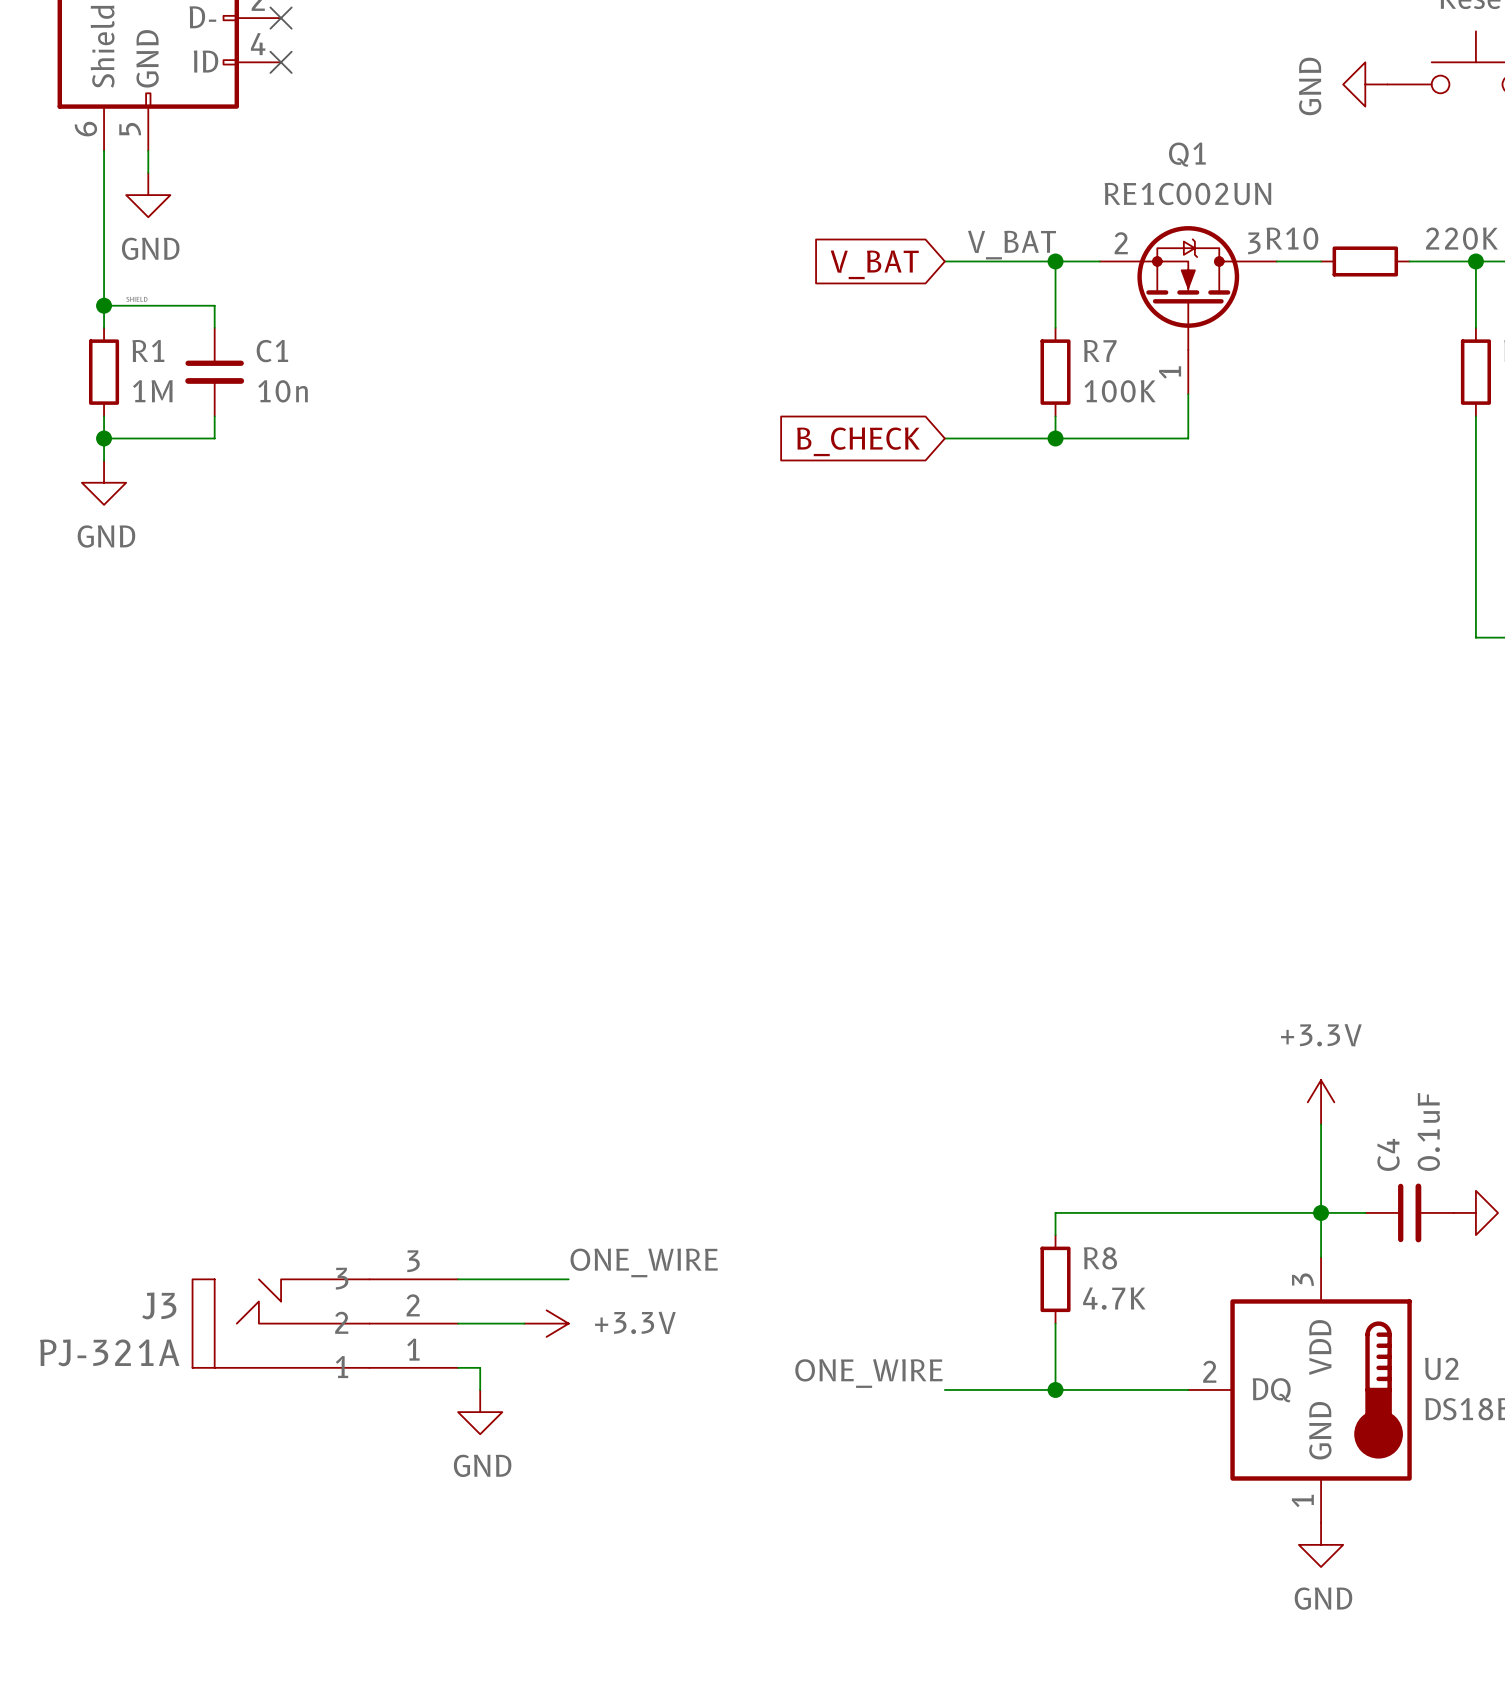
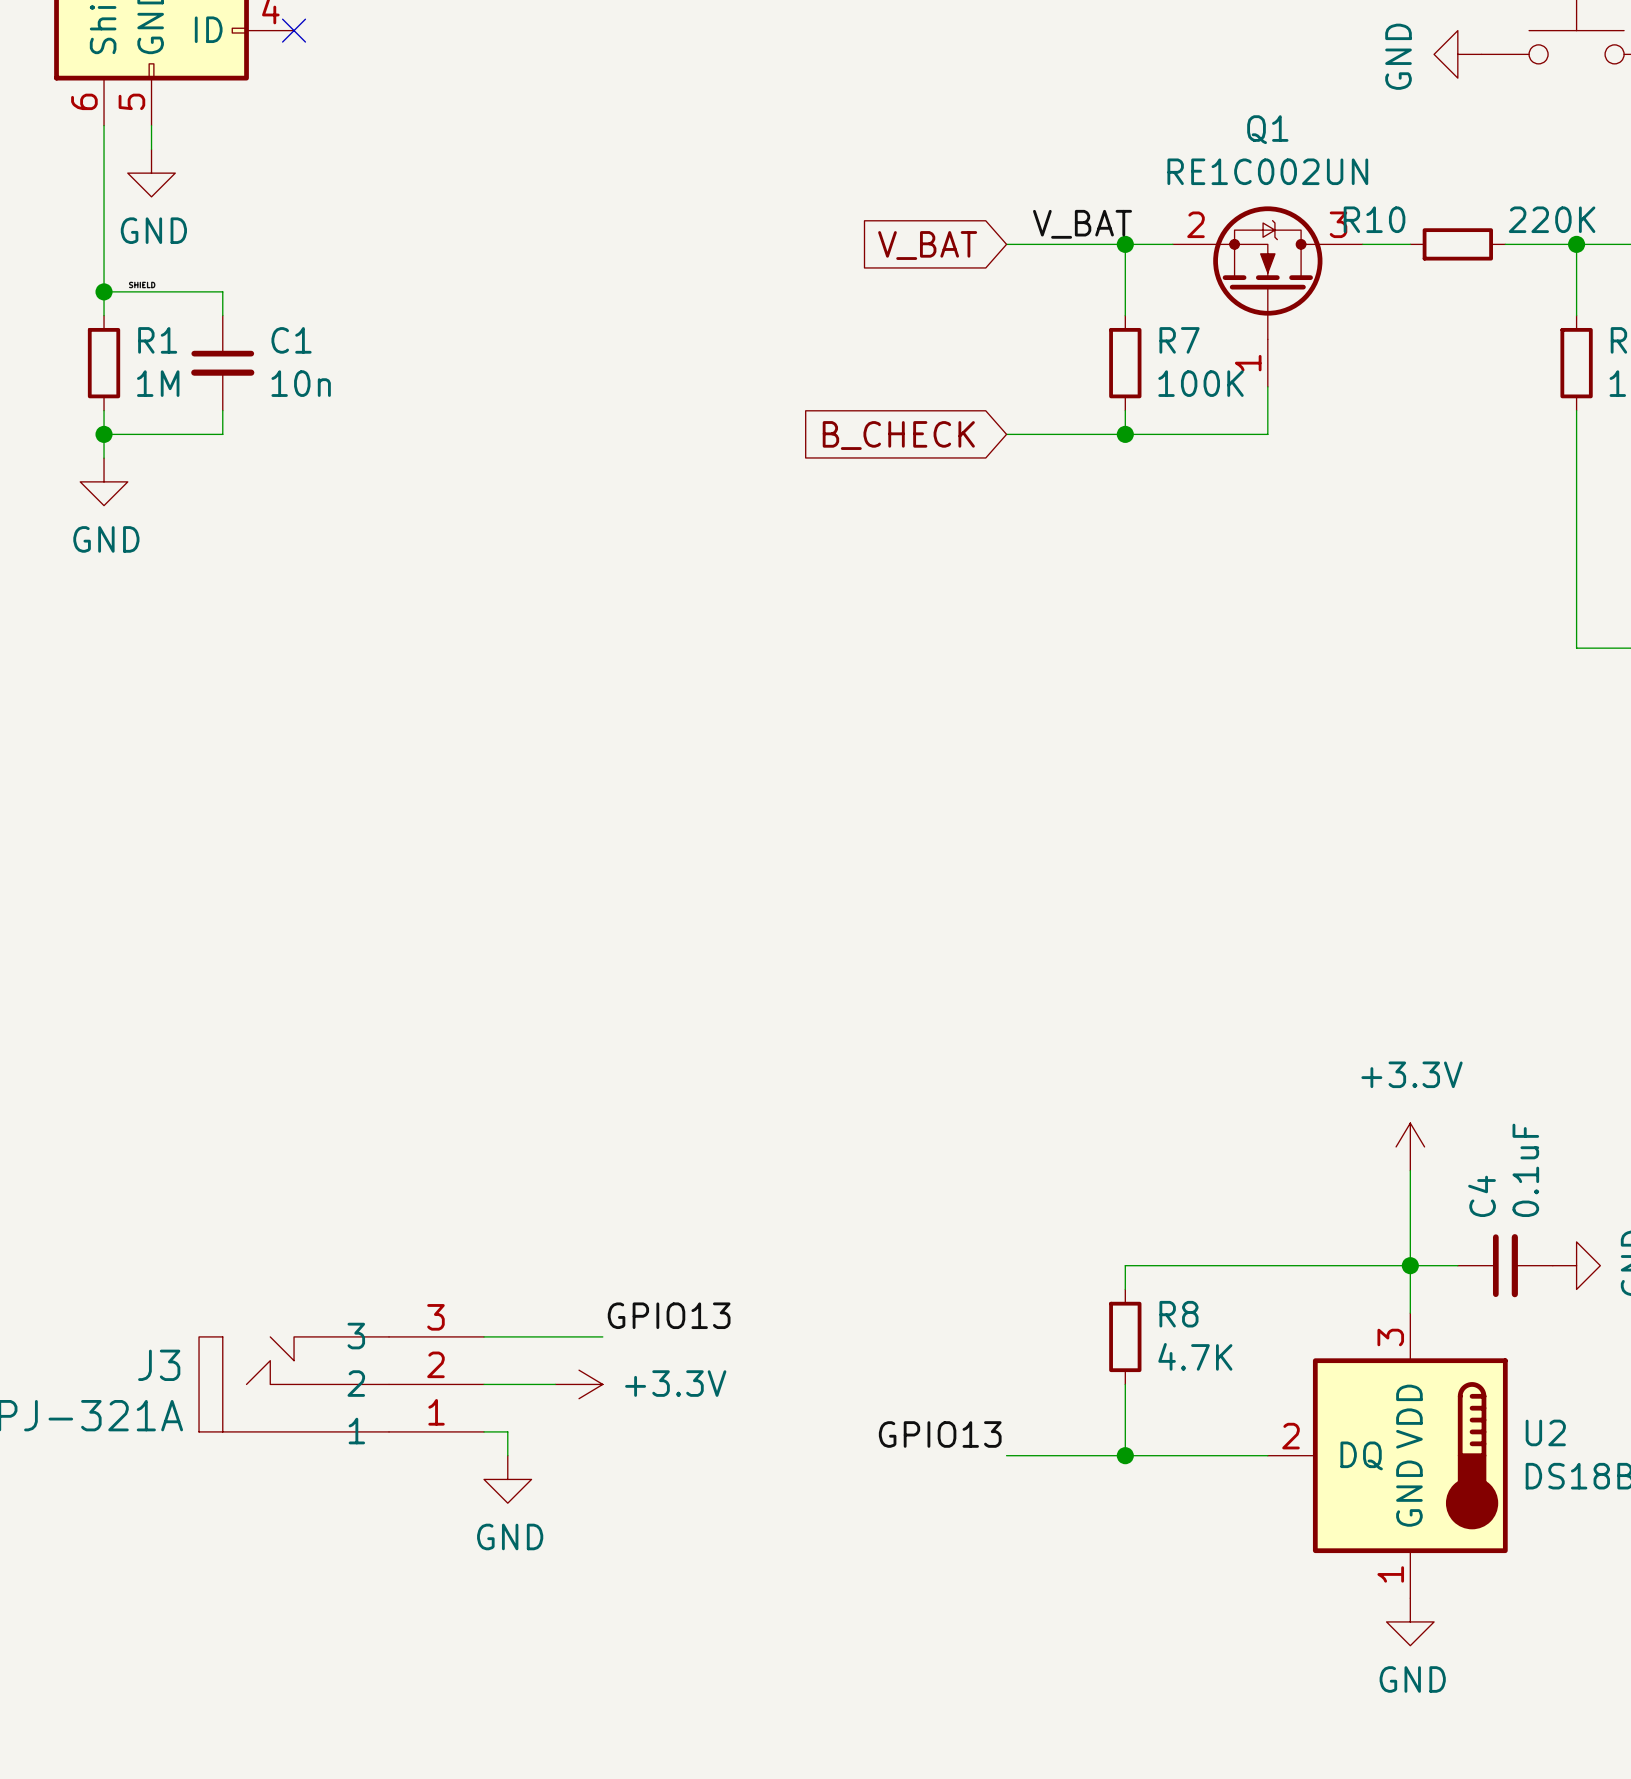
label: ONE_WIRE (644, 1262) -> GPIO13 (669, 1315)
label: ONE_WIRE (868, 1373) -> GPIO13 (940, 1434)

